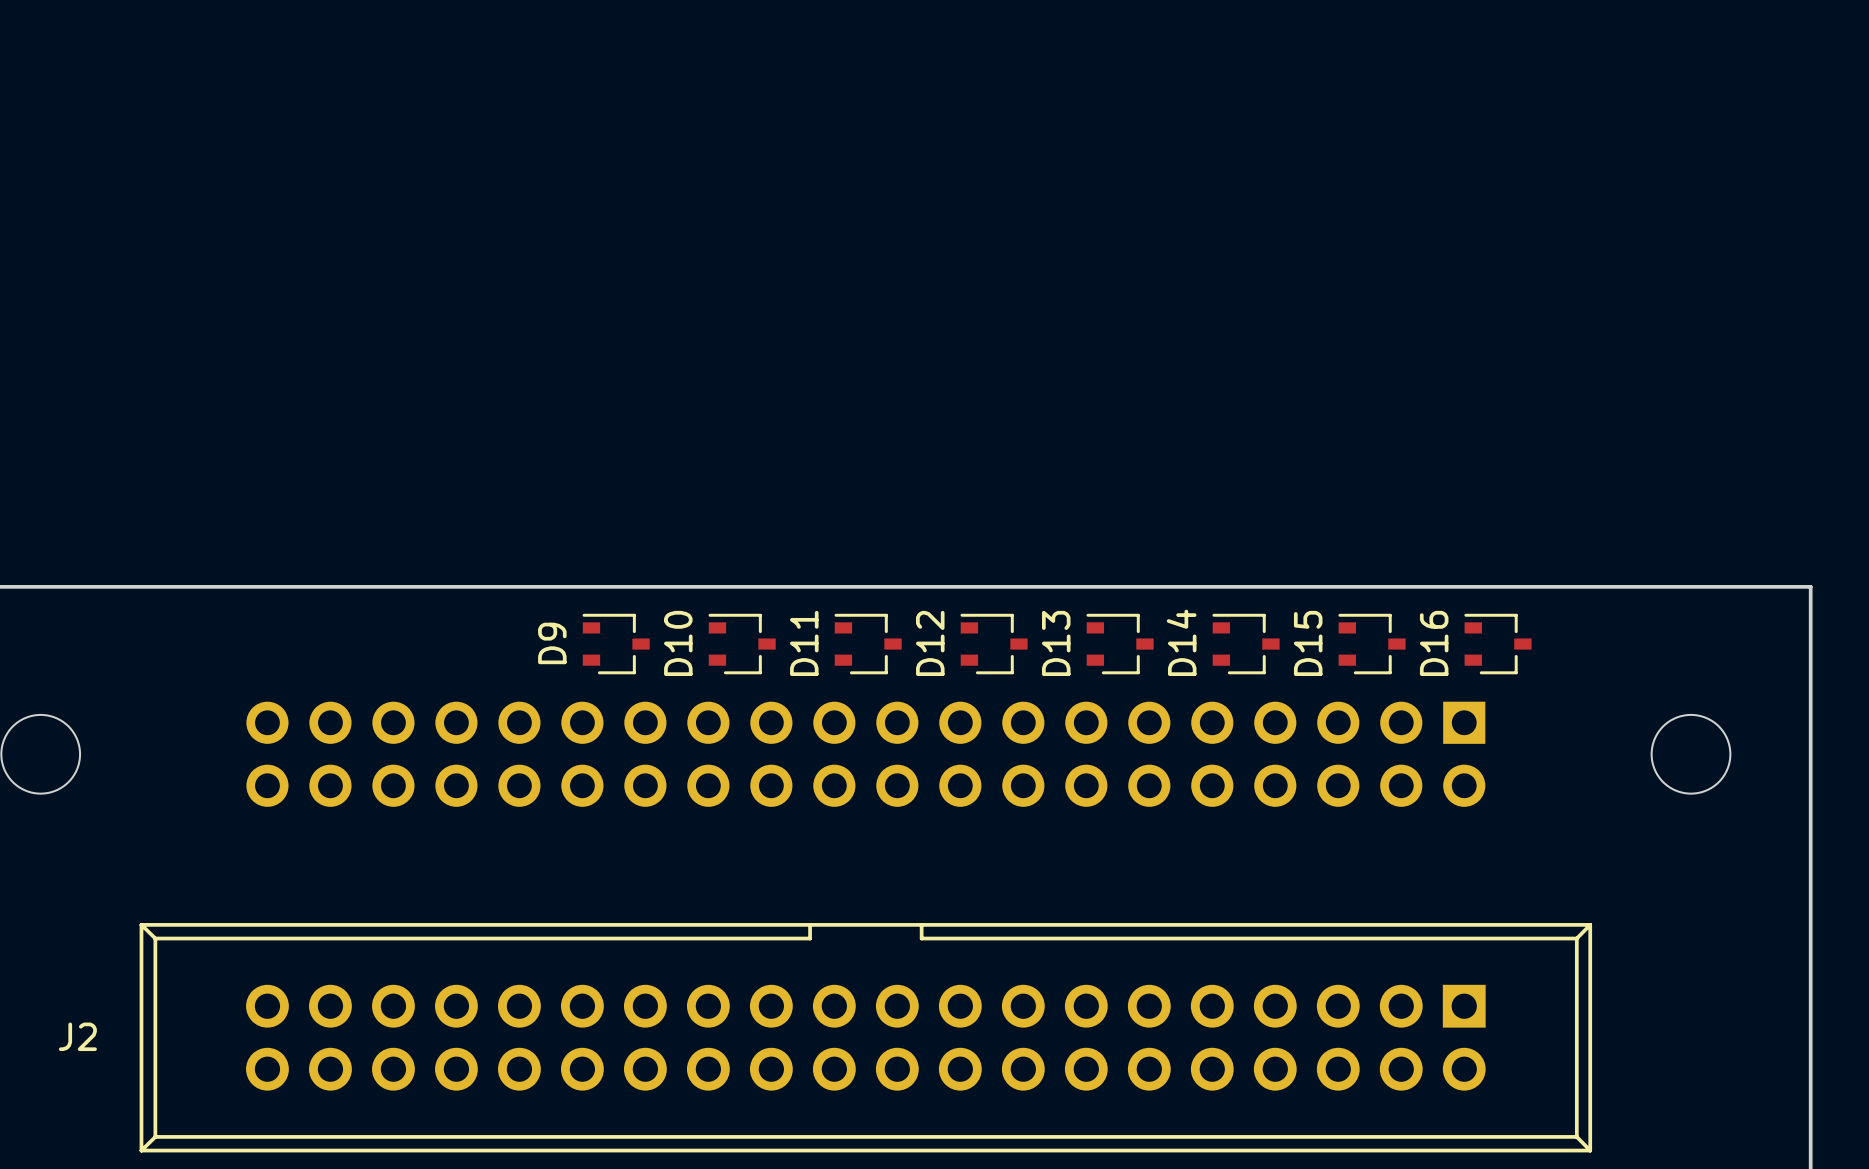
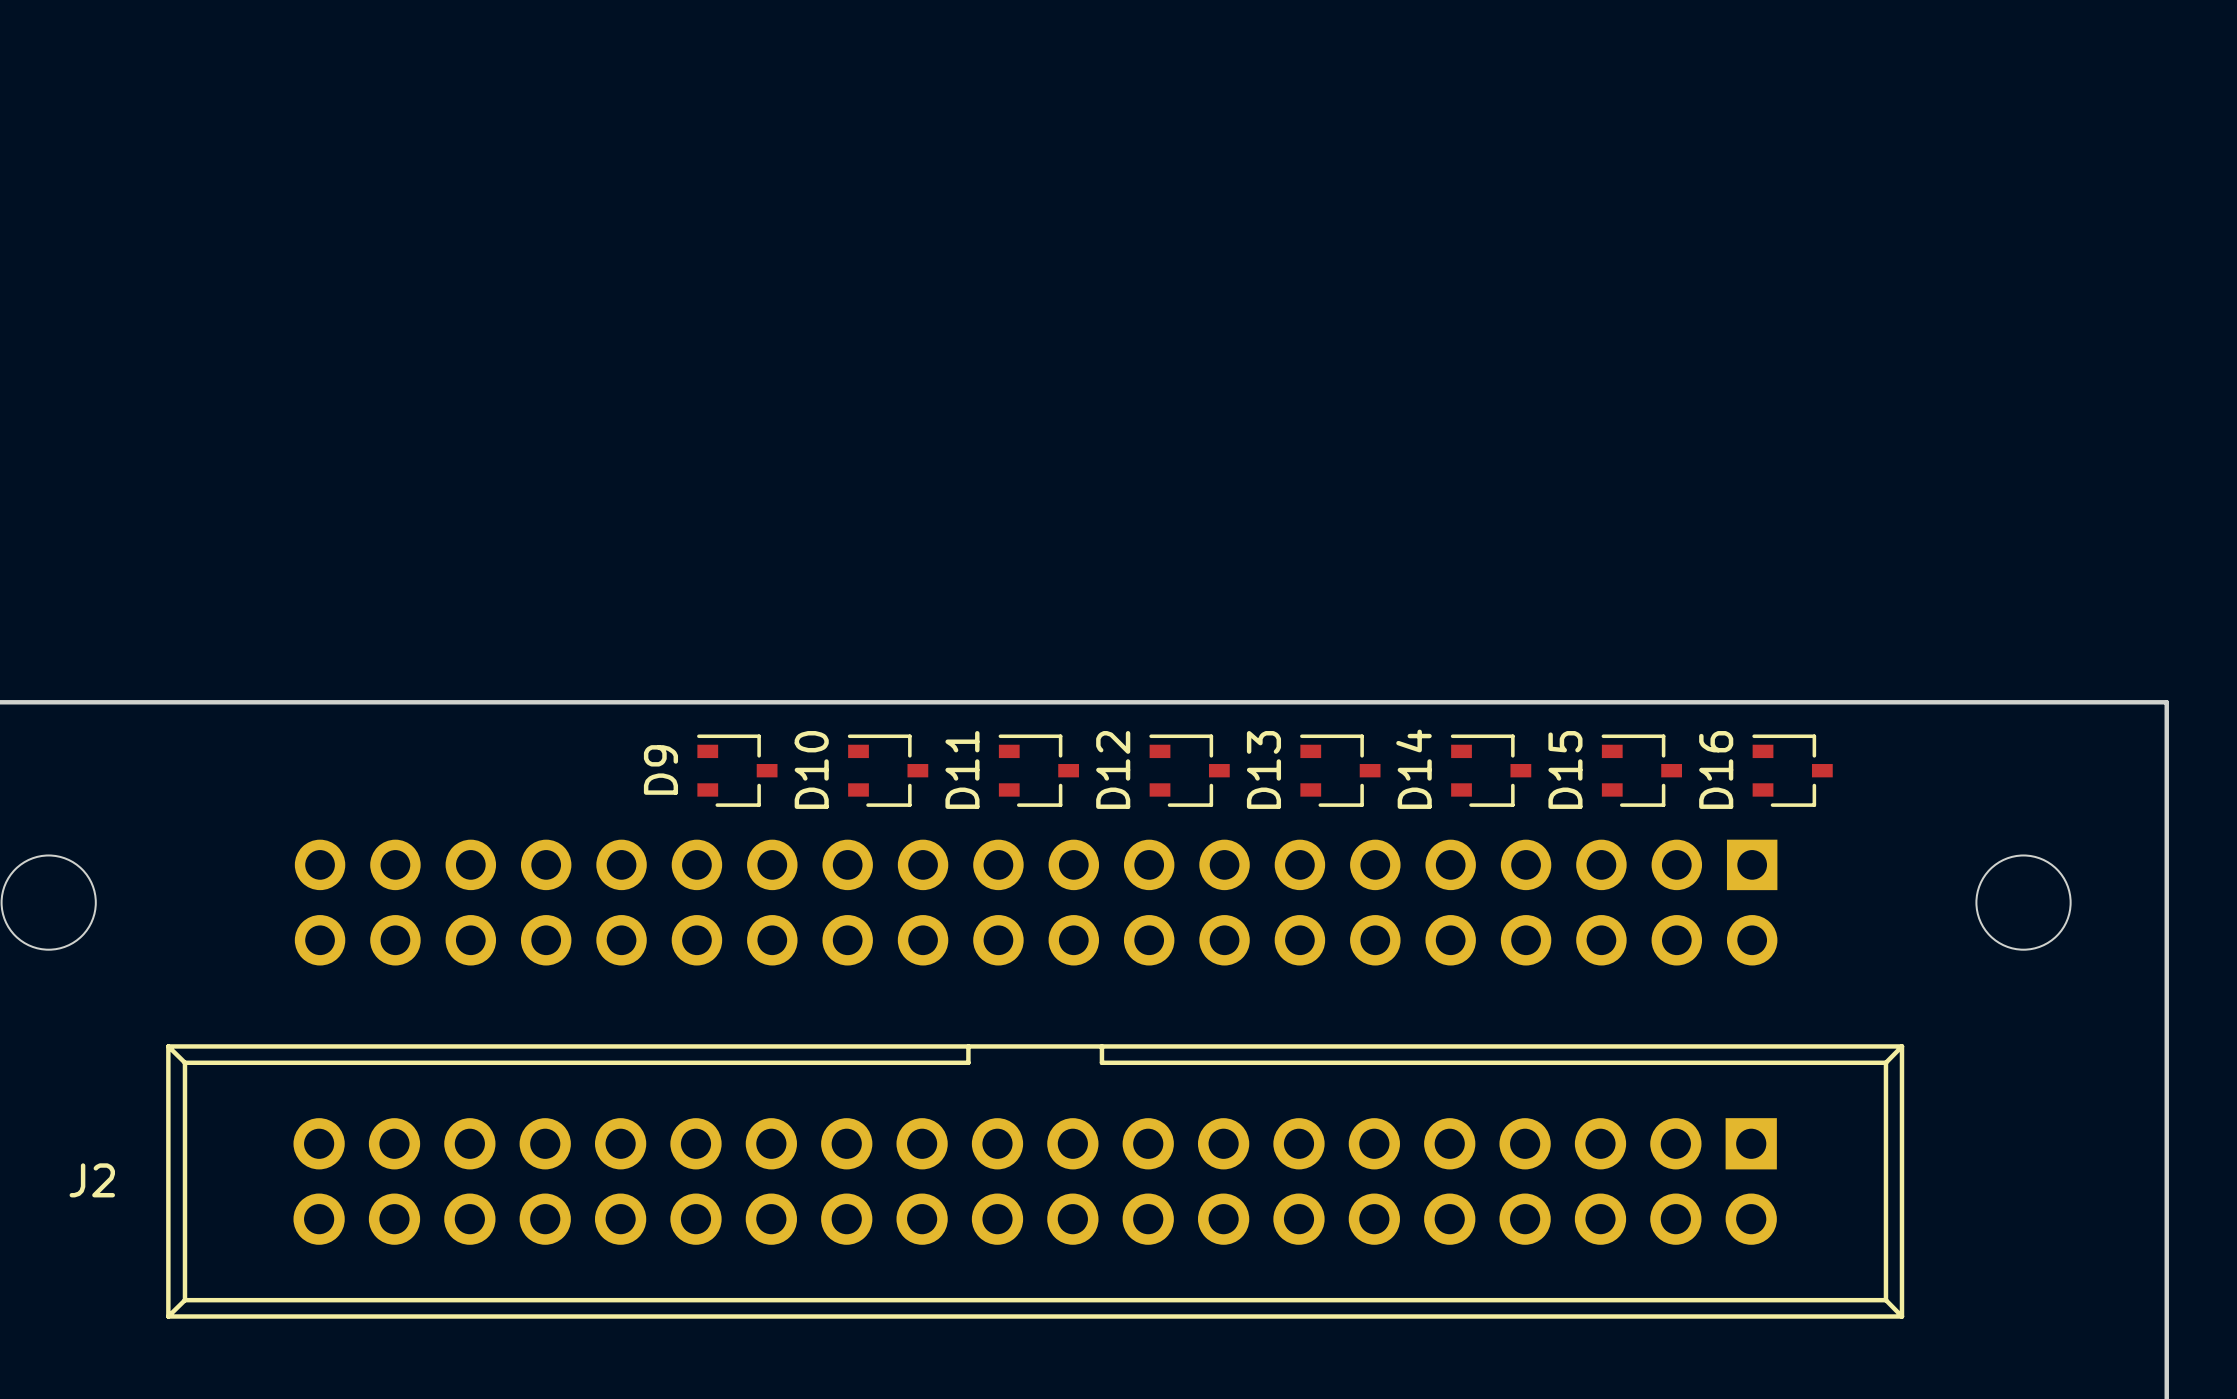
J2 position: (865, 1037) -> (1035, 1181)

